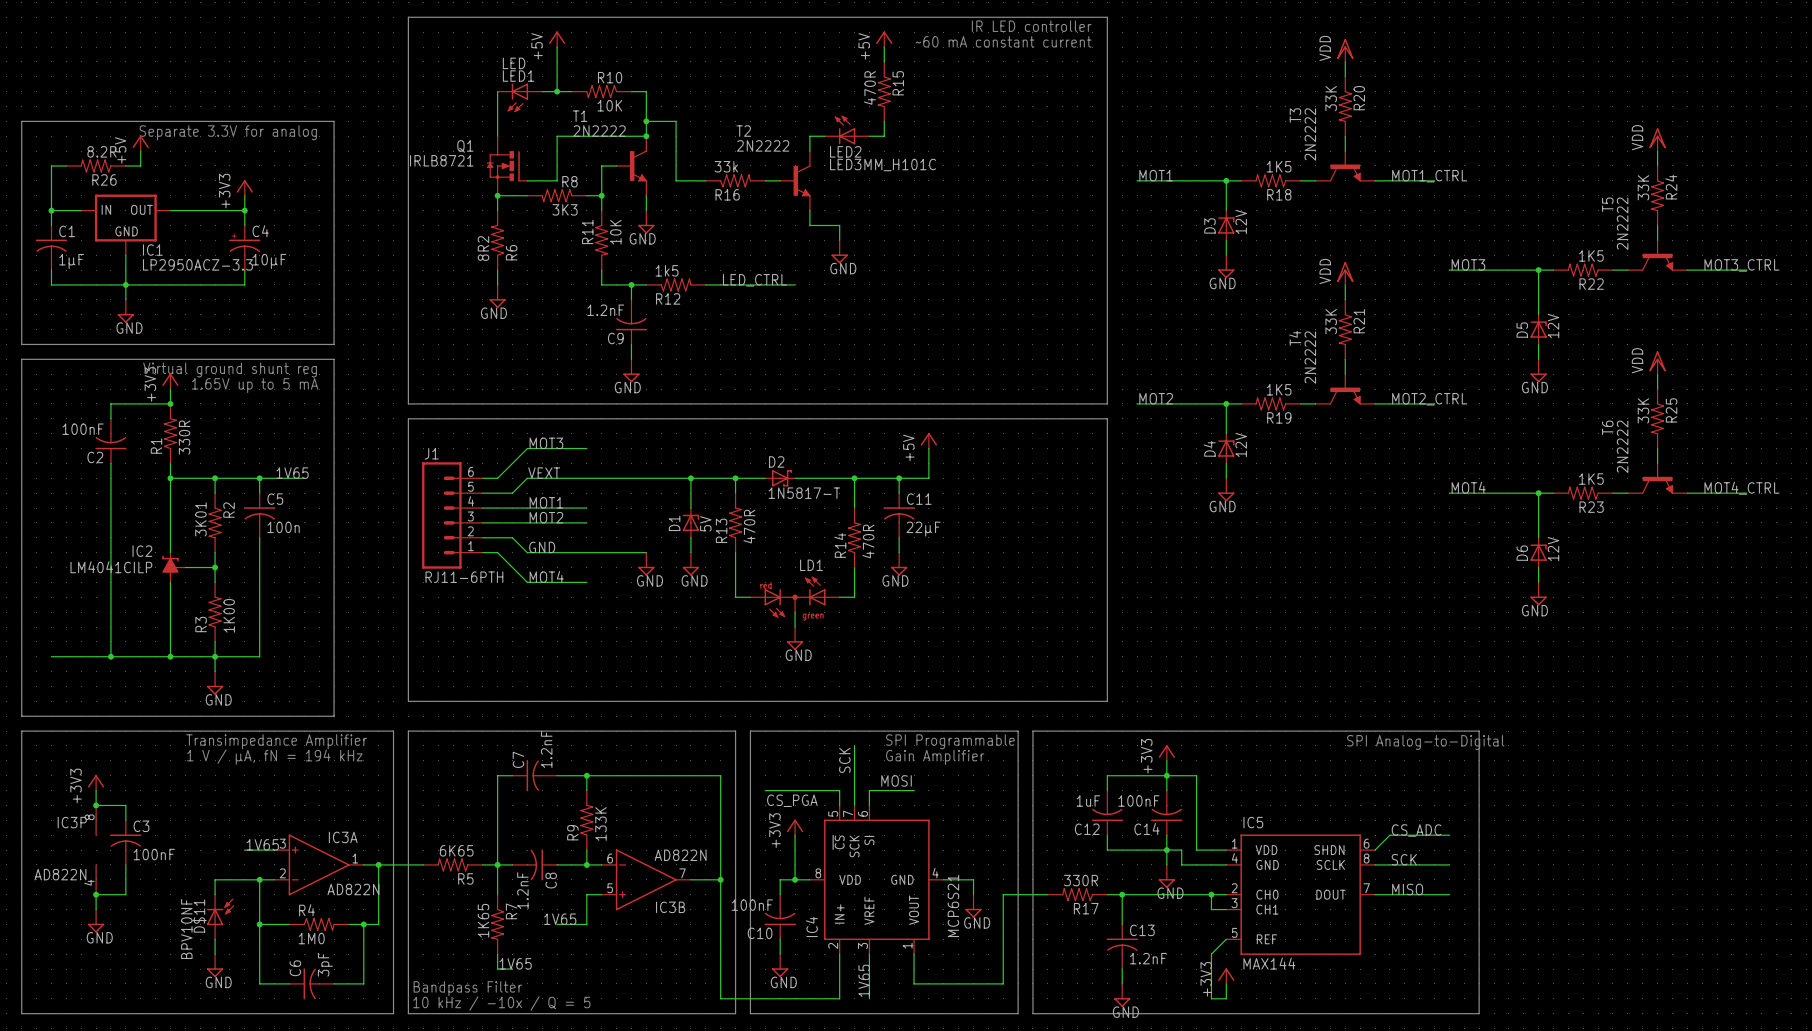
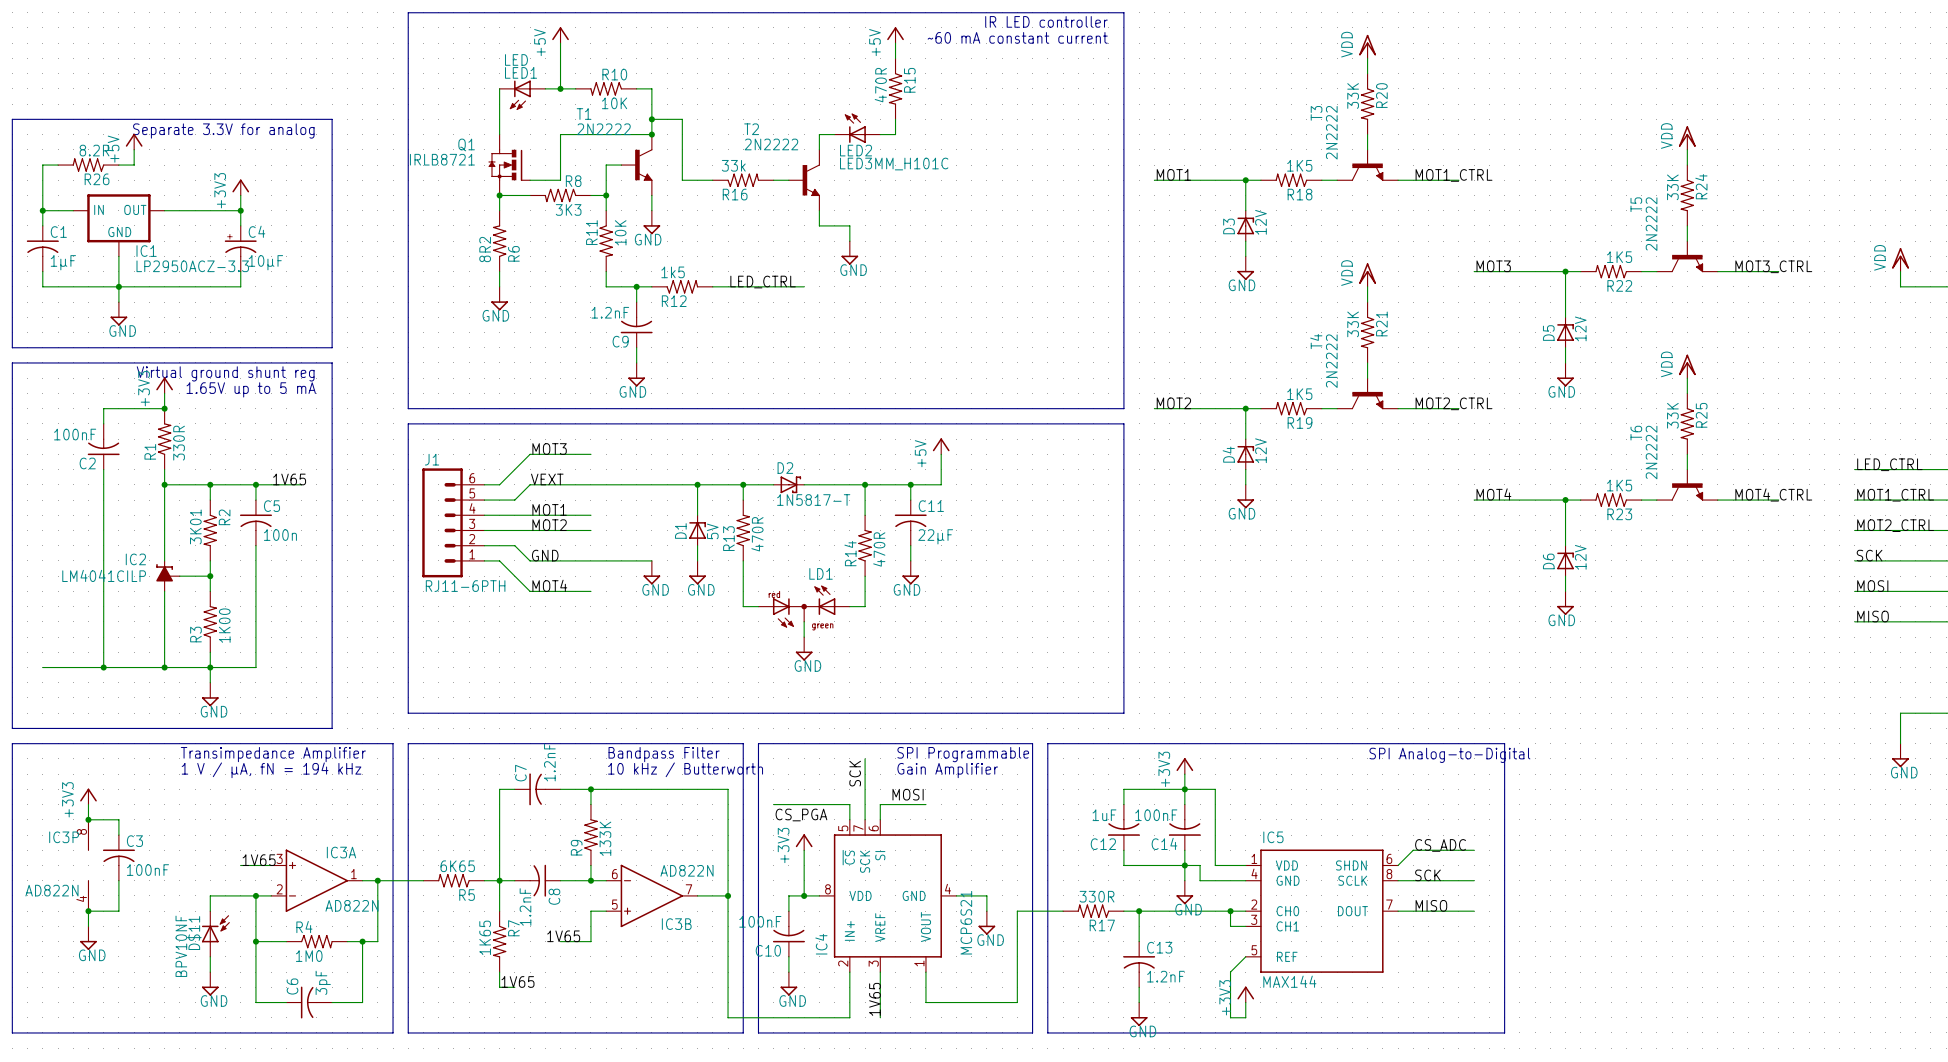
text: none -> Bandpass Filter (664, 754)
text: none -> 10 kHz / Butterworth (685, 769)
text: Bandpass Filter (467, 988) -> none
text: 10 kHz / -10x / Q = 5 (501, 1003) -> none

